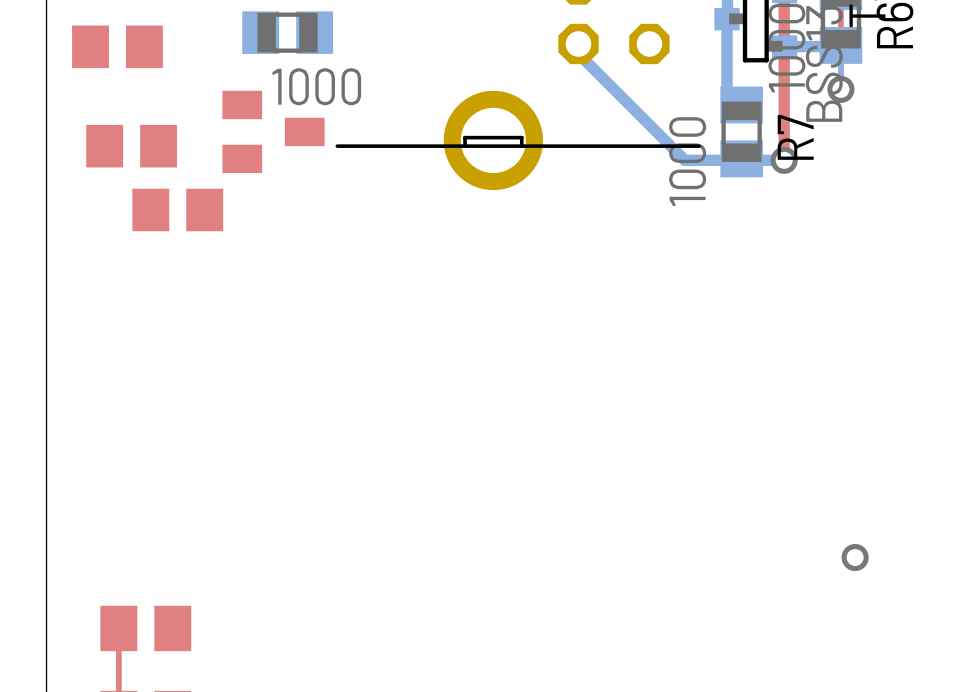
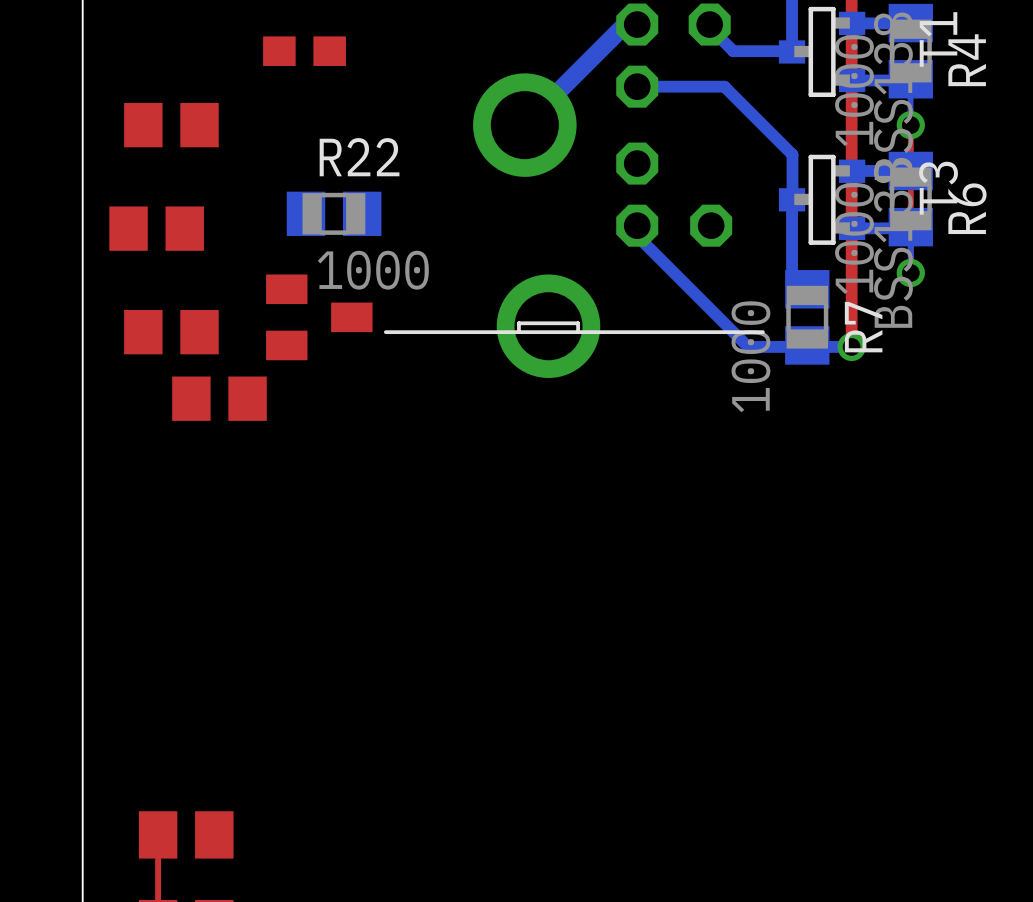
via: (855, 557) -> none

